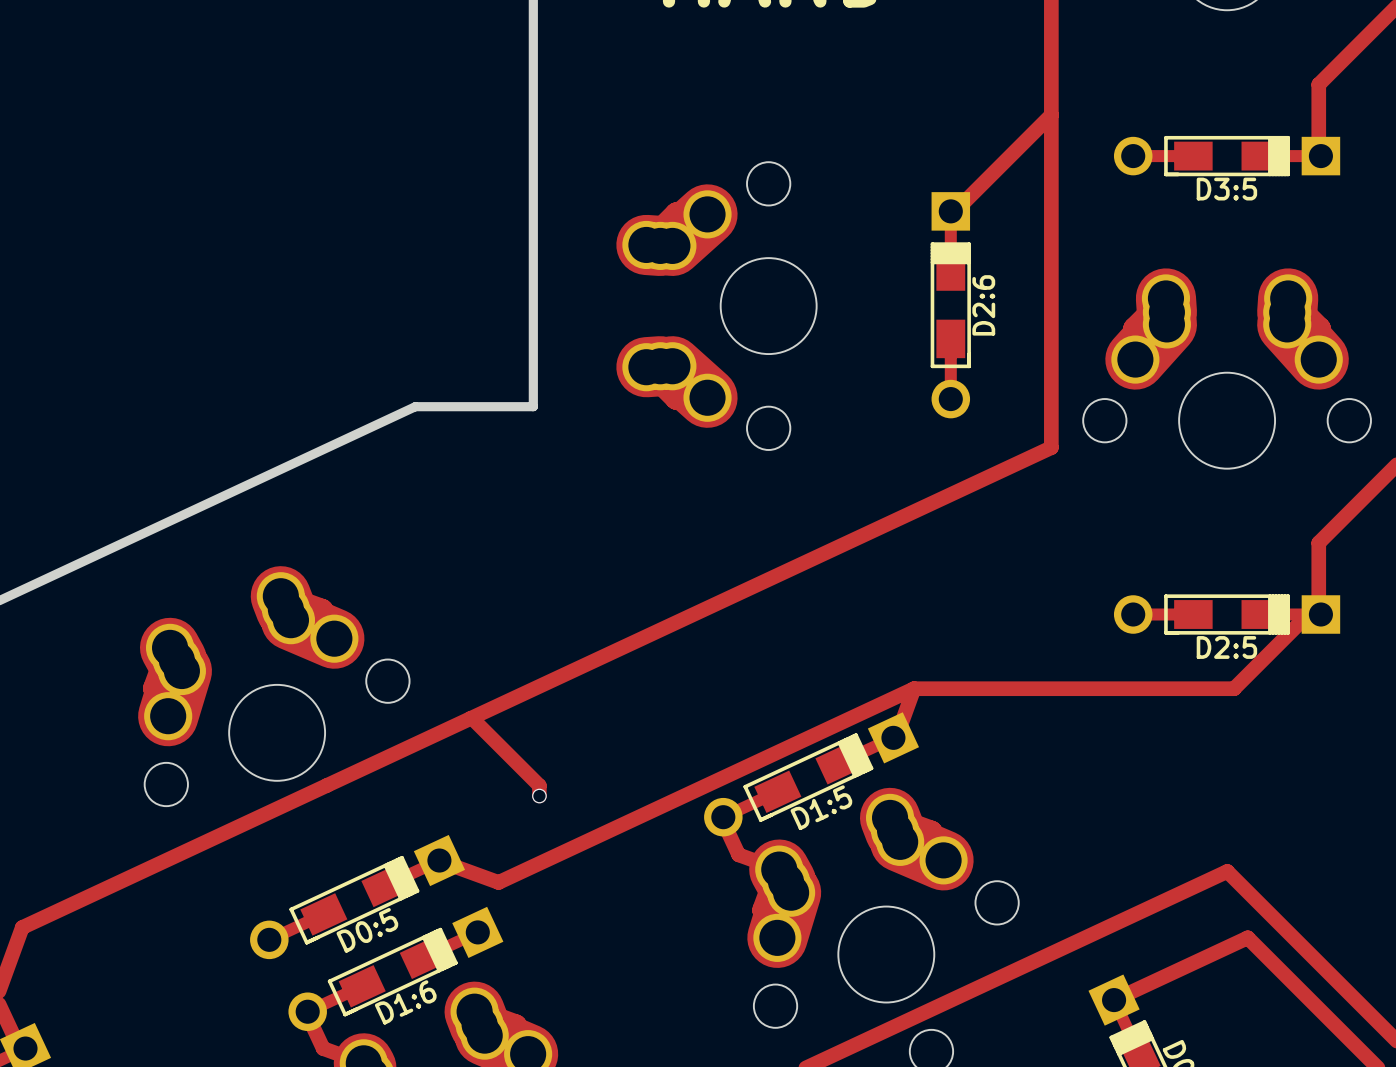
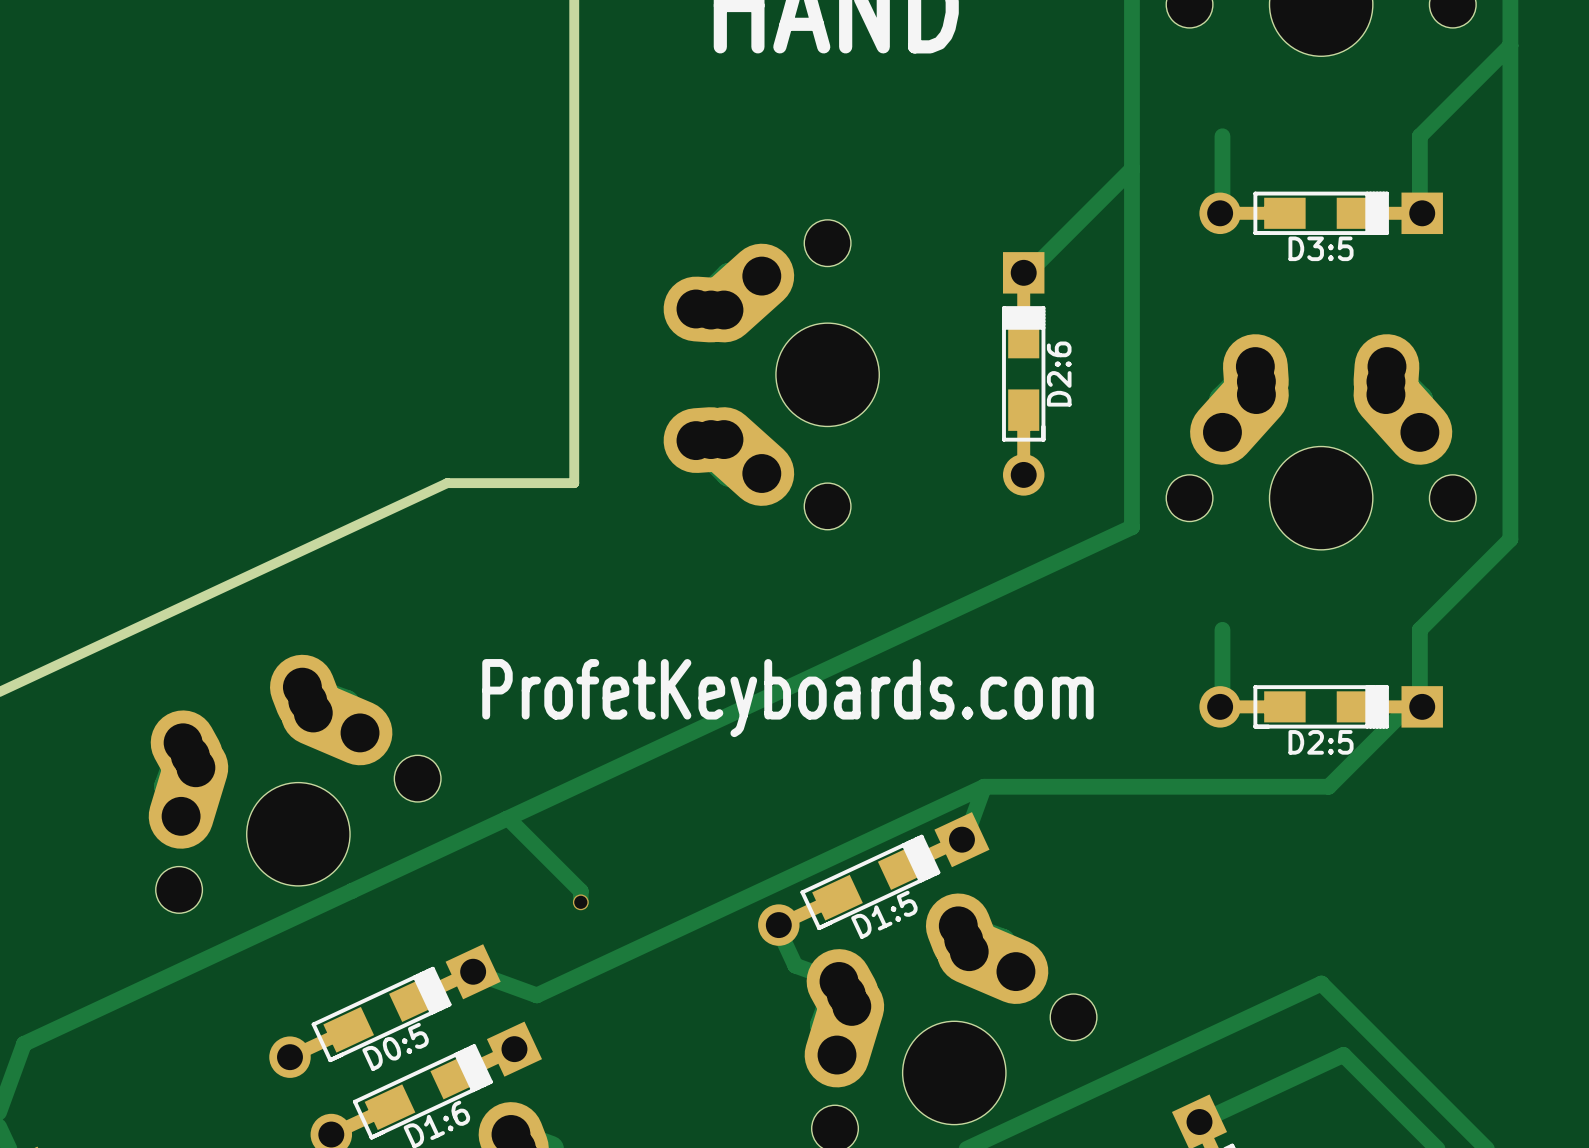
track: none -> (1222, 136) (1222, 202)
track: none -> (1222, 629) (1222, 695)
text: none -> ProfetKeyboards.com (787, 698)

